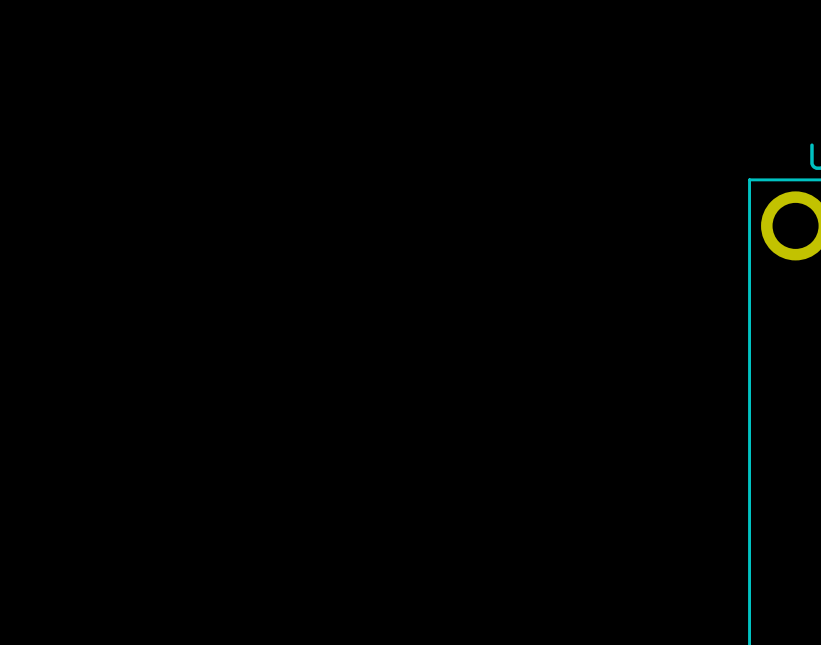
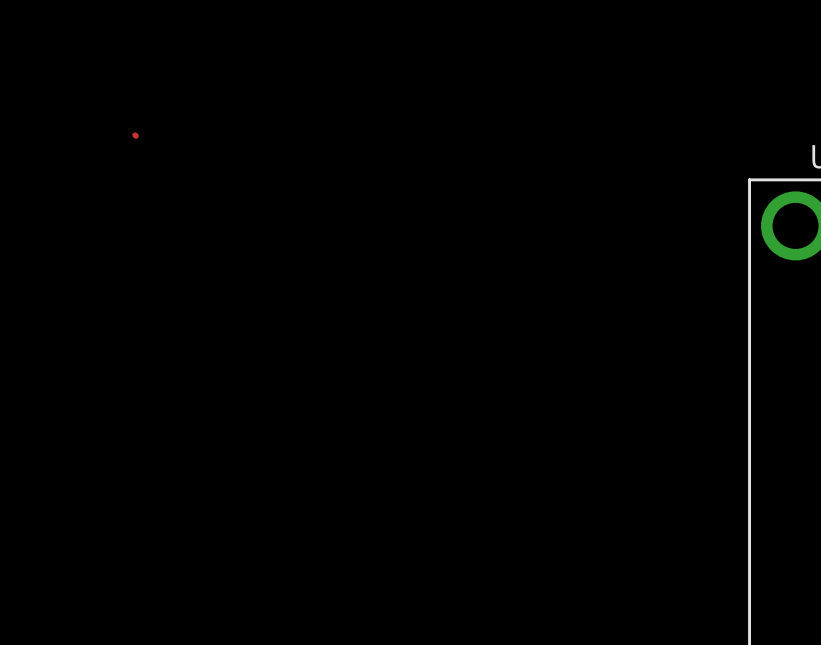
track: none -> (135, 135) (135, 135)

